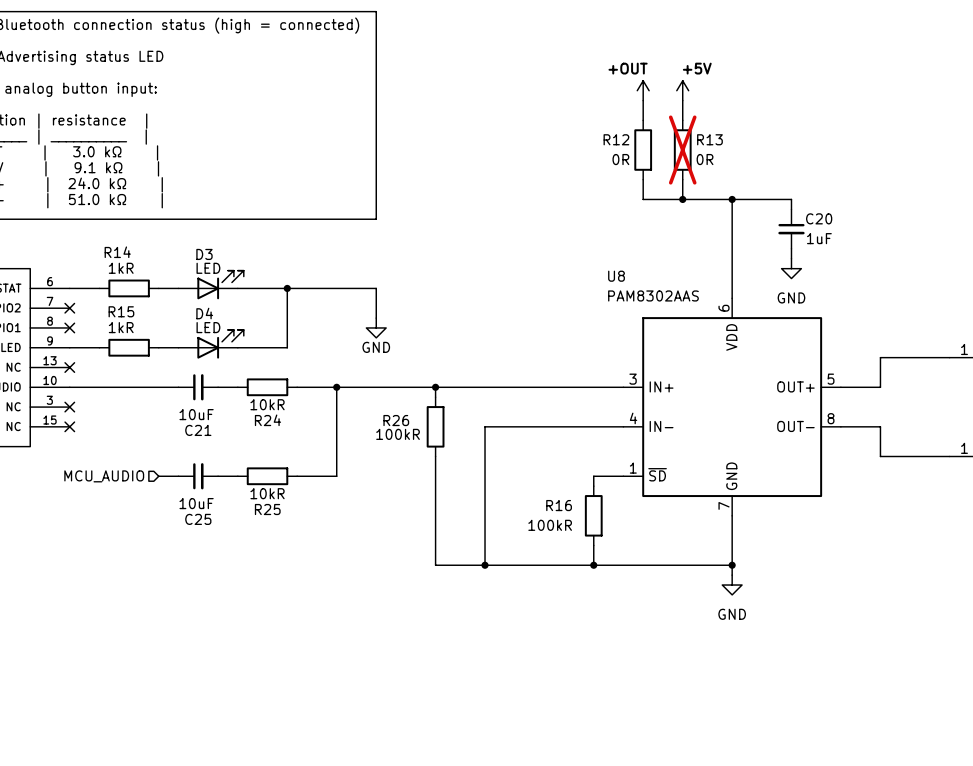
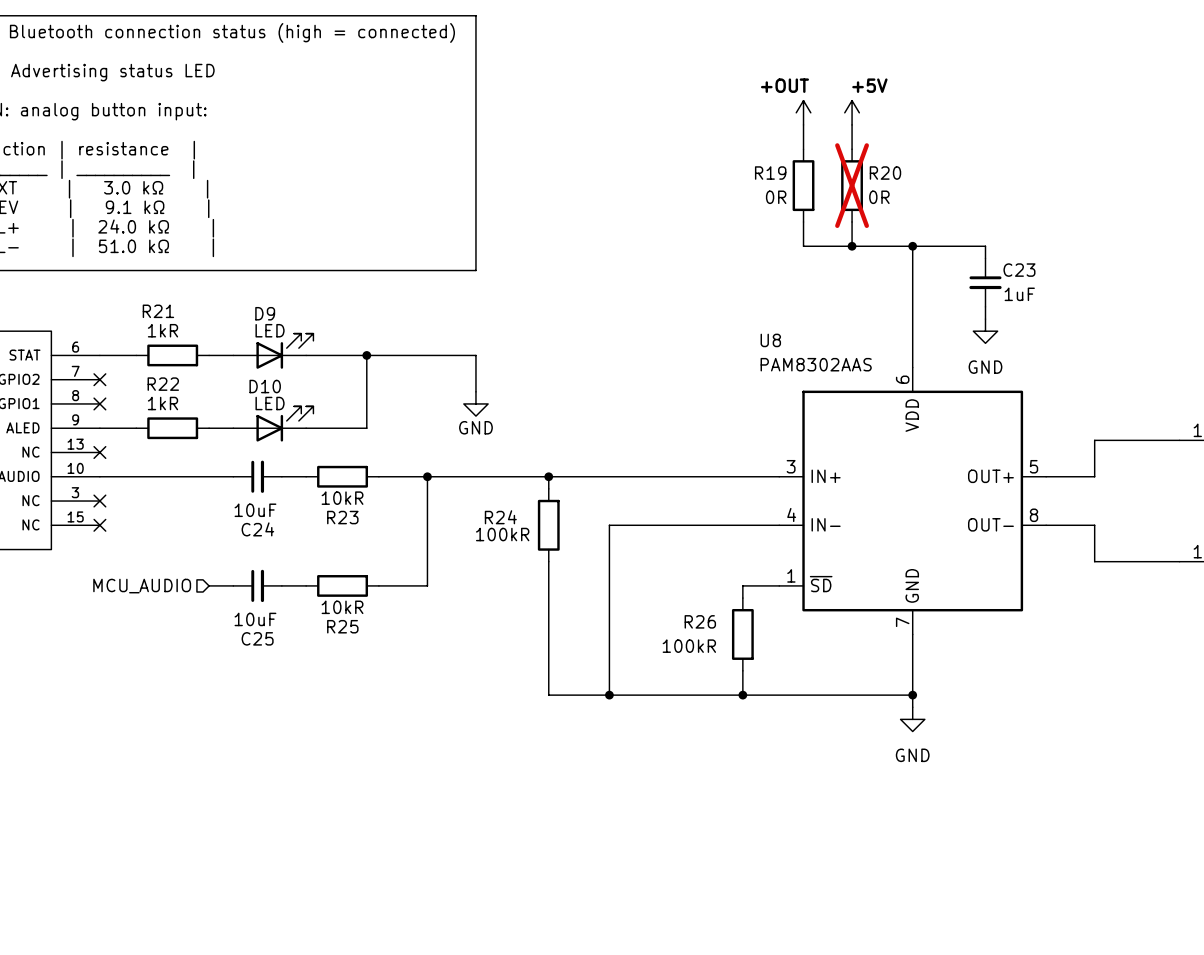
R12 name: R12 (616, 139) -> R19 (770, 173)
R13 name: R13 (709, 139) -> R20 (885, 173)
C20 name: C20 (819, 218) -> C23 (1019, 270)
R14 name: R14 (117, 252) -> R21 (158, 311)
D3 name: D3 (204, 254) -> D9 (265, 313)
R15 name: R15 (121, 311) -> R22 (163, 384)
D4 name: D4 (204, 313) -> D10 (265, 386)
R24 name: R24 (267, 420) -> R23 (342, 517)
R26 name: R26 (396, 420) -> R24 (500, 517)
C21 name: C21 (198, 430) -> C24 (257, 529)
R16 name: R16 (559, 505) -> R26 (700, 621)

